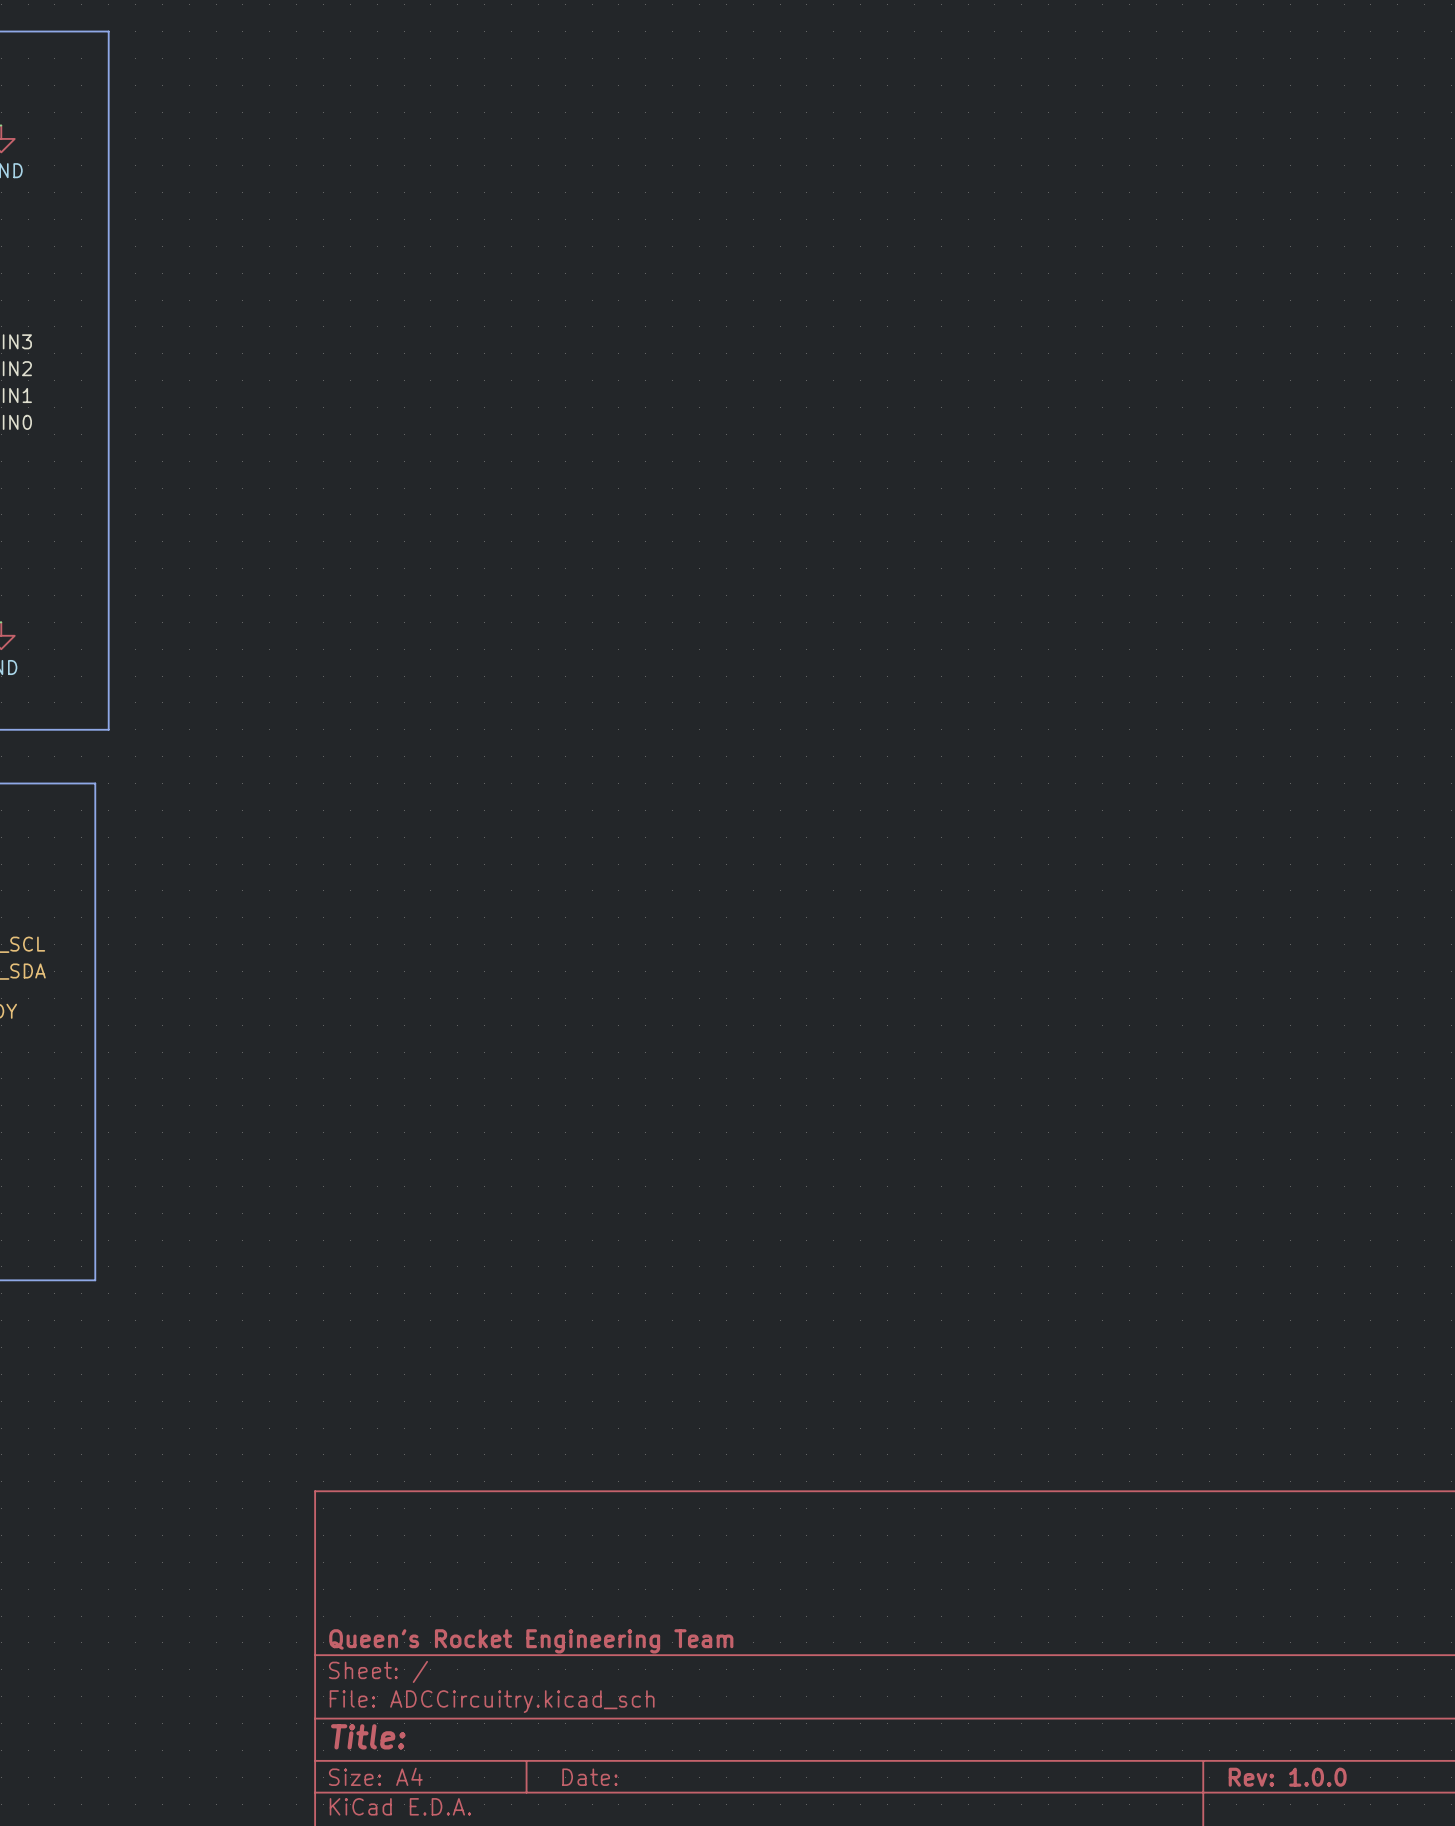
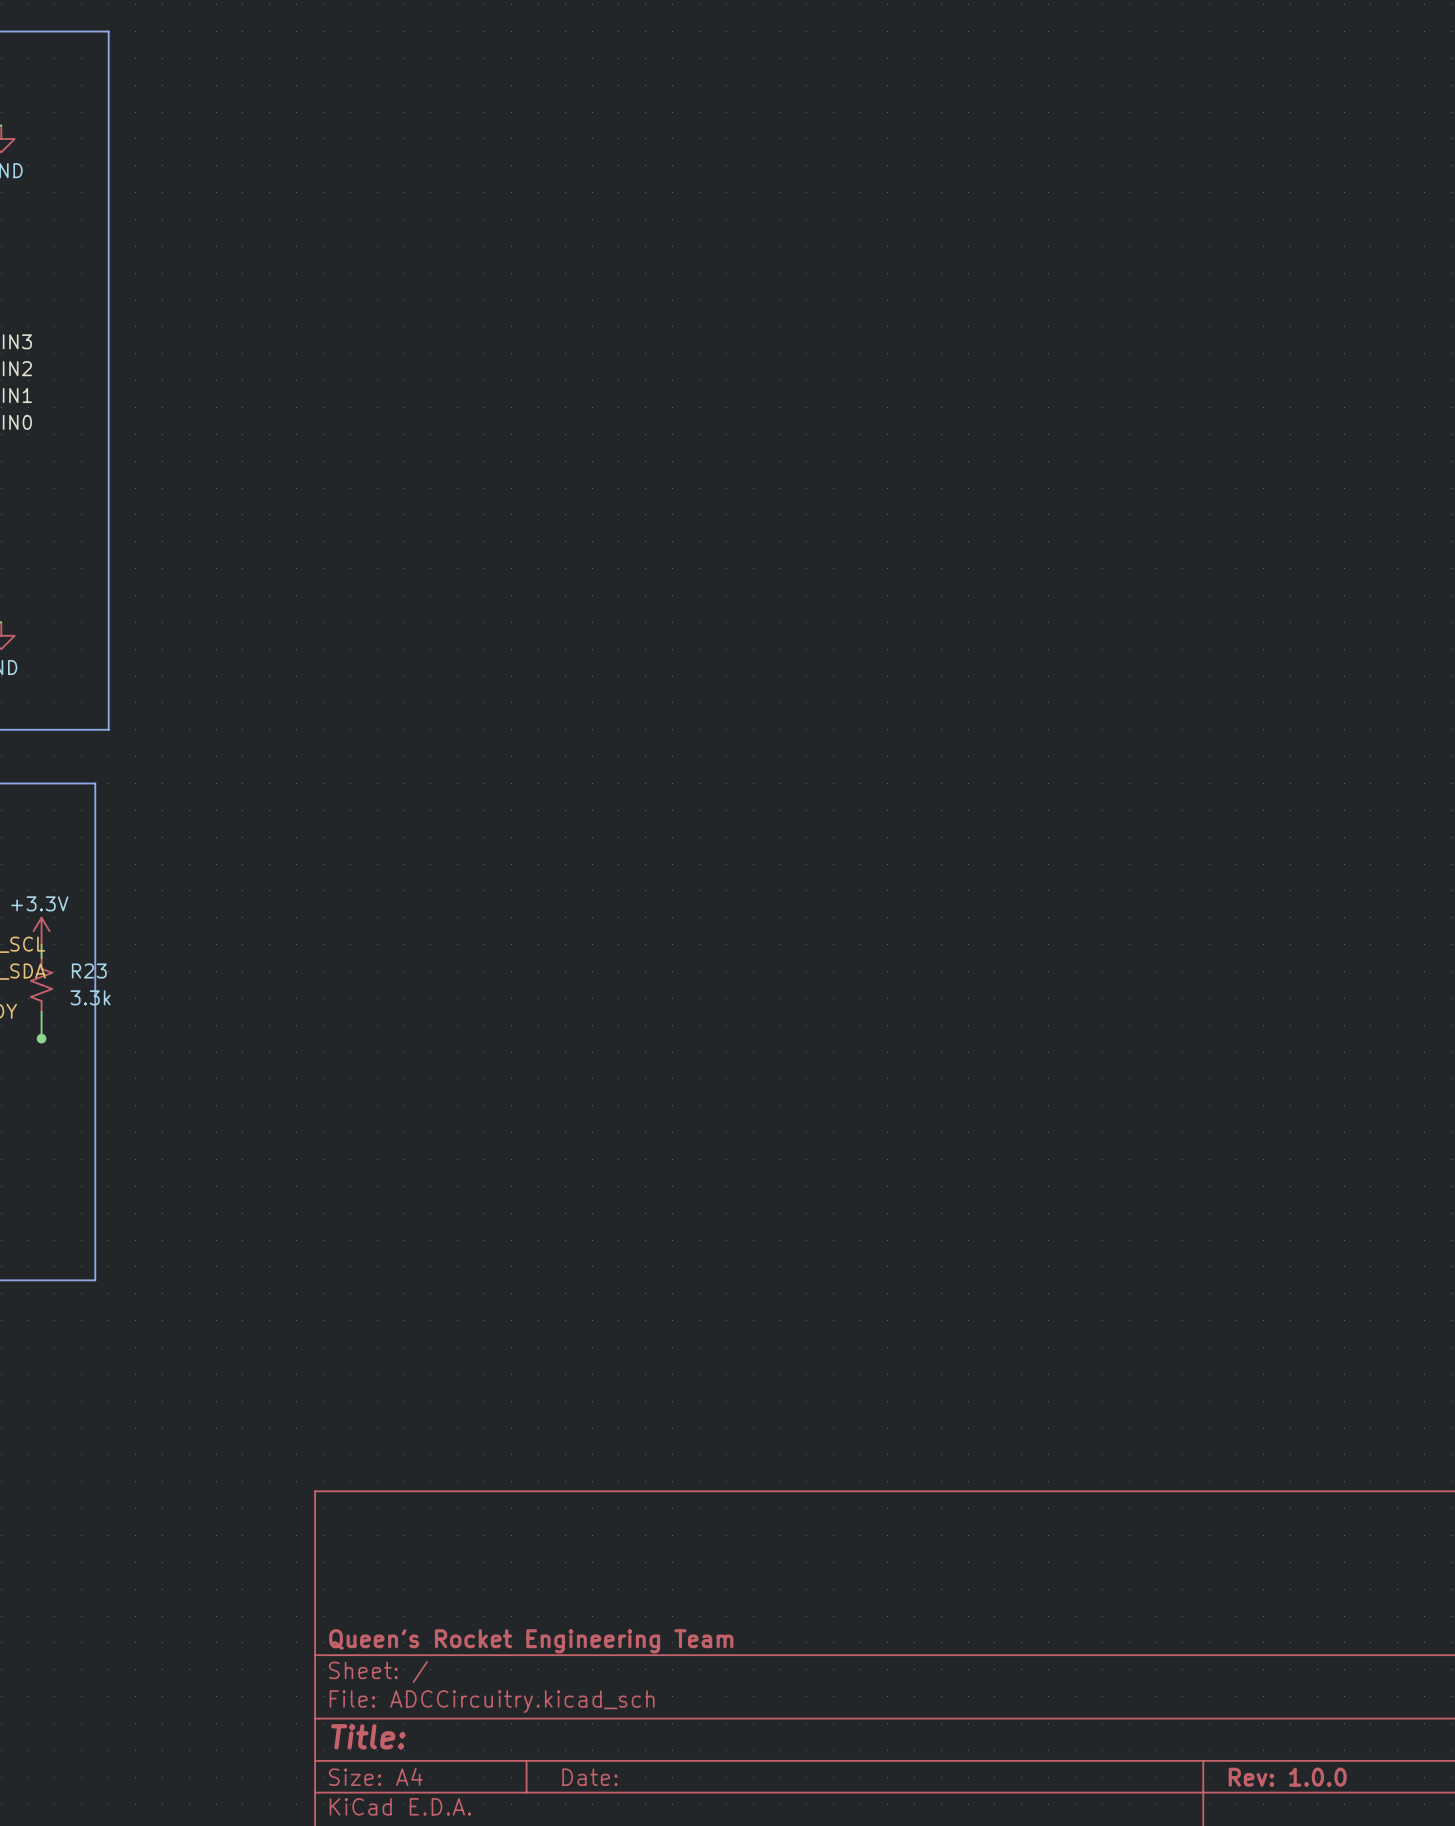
power symbol: none -> +3.3V (41, 931)
wire: none -> (41, 944) (41, 958)
R23: none -> 3.3k (41, 984)
wire: none -> (41, 1011) (41, 1038)
junction: none -> (41, 1038)

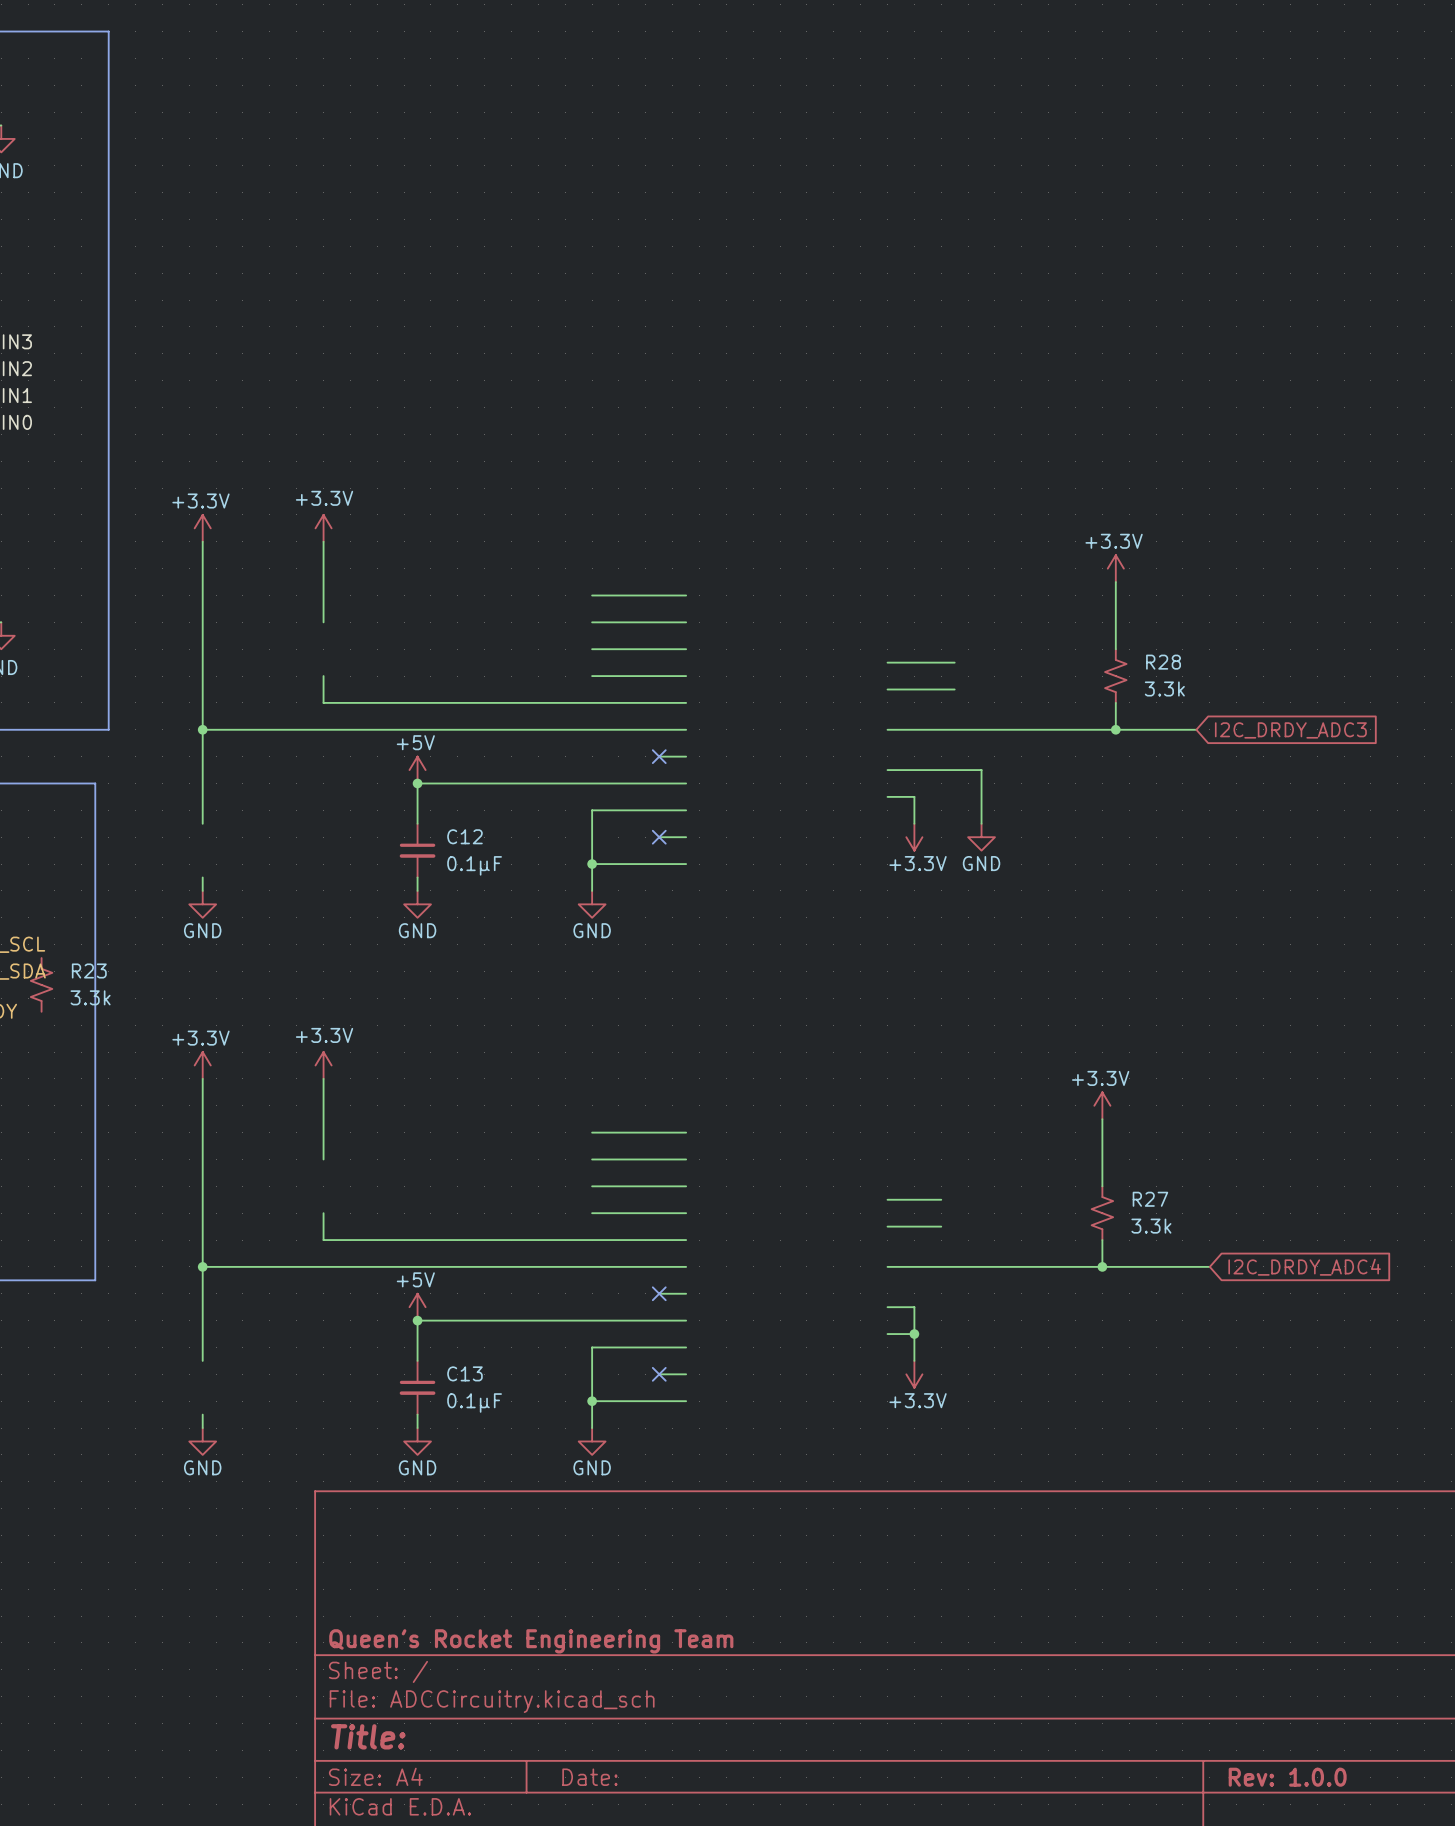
power symbol: none -> +3.3V (202, 528)
power symbol: none -> +3.3V (323, 528)
wire: none -> (202, 541) (202, 823)
wire: none -> (323, 541) (323, 622)
power symbol: none -> +3.3V (1115, 568)
wire: none -> (1115, 582) (1115, 649)
wire: none -> (592, 595) (686, 595)
wire: none -> (592, 622) (686, 622)
wire: none -> (592, 649) (686, 649)
wire: none -> (887, 662) (954, 662)
wire: none -> (323, 676) (323, 702) (686, 702)
wire: none -> (592, 676) (686, 676)
R28: none -> 3.3k (1115, 676)
wire: none -> (887, 689) (954, 689)
wire: none -> (1115, 702) (1115, 729)
wire: none -> (202, 729) (686, 729)
junction: none -> (202, 729)
wire: none -> (887, 729) (1196, 729)
junction: none -> (1115, 729)
global label: none -> I2C_DRDY_ADC3 (1290, 730)
wire: none -> (659, 756) (686, 756)
no-connect mark: none -> (659, 756)
power symbol: none -> +5V (417, 770)
wire: none -> (887, 770) (981, 770) (981, 823)
junction: none -> (417, 783)
wire: none -> (686, 783) (417, 783) (417, 823)
wire: none -> (887, 796) (914, 796) (914, 823)
wire: none -> (686, 810) (592, 810) (592, 890)
wire: none -> (659, 837) (686, 837)
no-connect mark: none -> (659, 837)
power symbol: none -> +3.3V (914, 837)
power symbol: none -> GND (981, 837)
C12: none -> 0.1μF (417, 850)
wire: none -> (592, 864) (686, 864)
junction: none -> (592, 864)
wire: none -> (417, 877) (417, 890)
power symbol: none -> GND (202, 904)
power symbol: none -> GND (417, 904)
power symbol: none -> GND (592, 904)
power symbol: +3.3V (41, 931) -> none
wire: (41, 944) (41, 958) -> (202, 877) (202, 890)
wire: (41, 1011) (41, 1038) -> none
junction: (41, 1038) -> none
power symbol: none -> +3.3V (202, 1065)
power symbol: none -> +3.3V (323, 1065)
wire: none -> (202, 1078) (202, 1360)
wire: none -> (323, 1078) (323, 1159)
power symbol: none -> +3.3V (1102, 1105)
wire: none -> (1102, 1119) (1102, 1186)
wire: none -> (592, 1132) (686, 1132)
wire: none -> (592, 1159) (686, 1159)
wire: none -> (592, 1186) (686, 1186)
wire: none -> (887, 1199) (941, 1199)
wire: none -> (323, 1213) (323, 1240) (686, 1240)
wire: none -> (592, 1213) (686, 1213)
R27: none -> 3.3k (1102, 1213)
wire: none -> (887, 1226) (941, 1226)
wire: none -> (1102, 1240) (1102, 1266)
wire: none -> (202, 1266) (686, 1266)
junction: none -> (202, 1266)
wire: none -> (887, 1266) (1209, 1266)
junction: none -> (1102, 1266)
global label: none -> I2C_DRDY_ADC4 (1304, 1267)
wire: none -> (659, 1293) (686, 1293)
no-connect mark: none -> (659, 1293)
power symbol: none -> +5V (417, 1307)
wire: none -> (887, 1307) (914, 1307) (914, 1360)
junction: none -> (417, 1320)
wire: none -> (686, 1320) (417, 1320) (417, 1360)
wire: none -> (887, 1334) (914, 1334)
junction: none -> (914, 1334)
wire: none -> (686, 1347) (592, 1347) (592, 1428)
wire: none -> (659, 1374) (686, 1374)
no-connect mark: none -> (659, 1374)
power symbol: none -> +3.3V (914, 1374)
C13: none -> 0.1μF (417, 1387)
wire: none -> (592, 1401) (686, 1401)
junction: none -> (592, 1401)
wire: none -> (202, 1414) (202, 1428)
wire: none -> (417, 1414) (417, 1428)
power symbol: none -> GND (202, 1441)
power symbol: none -> GND (417, 1441)
power symbol: none -> GND (592, 1441)

